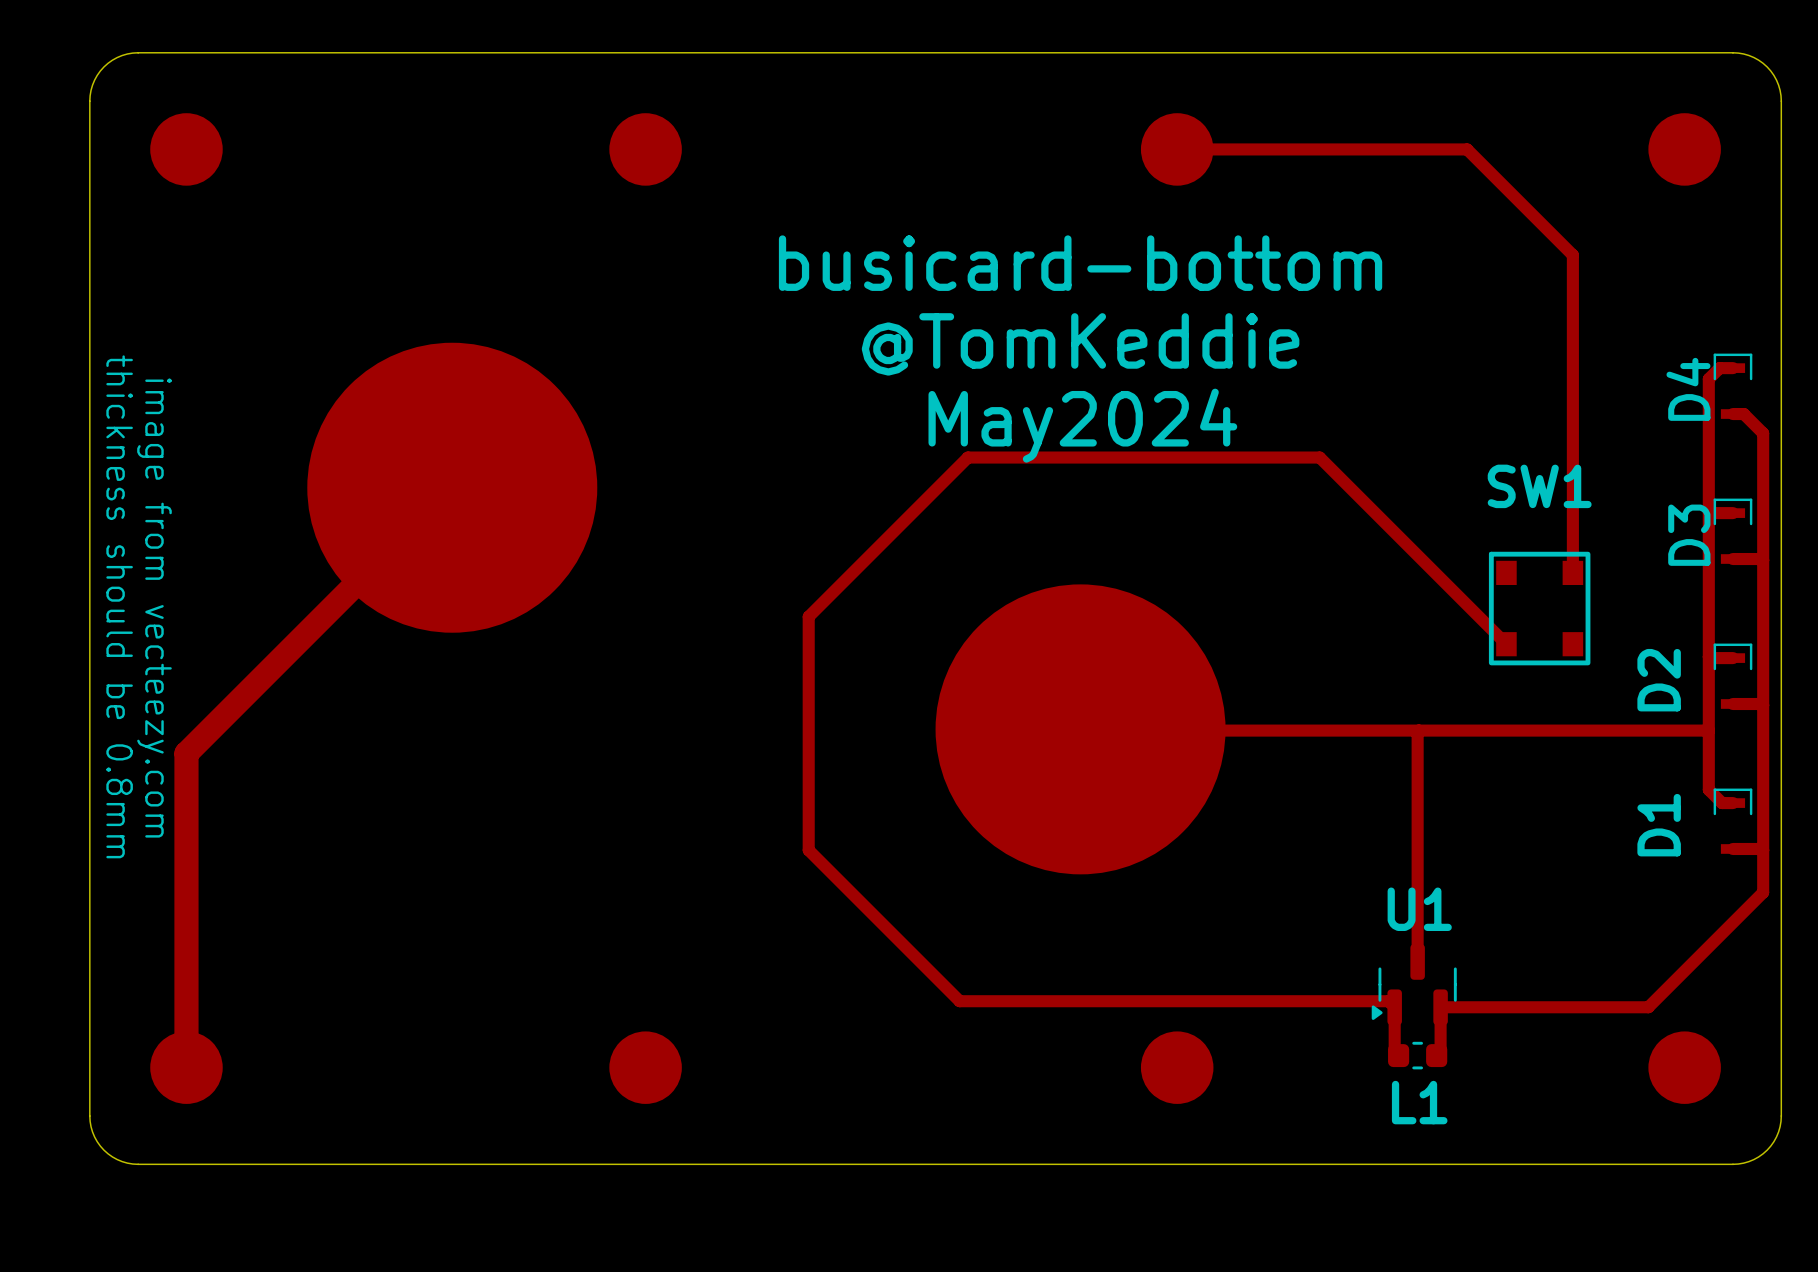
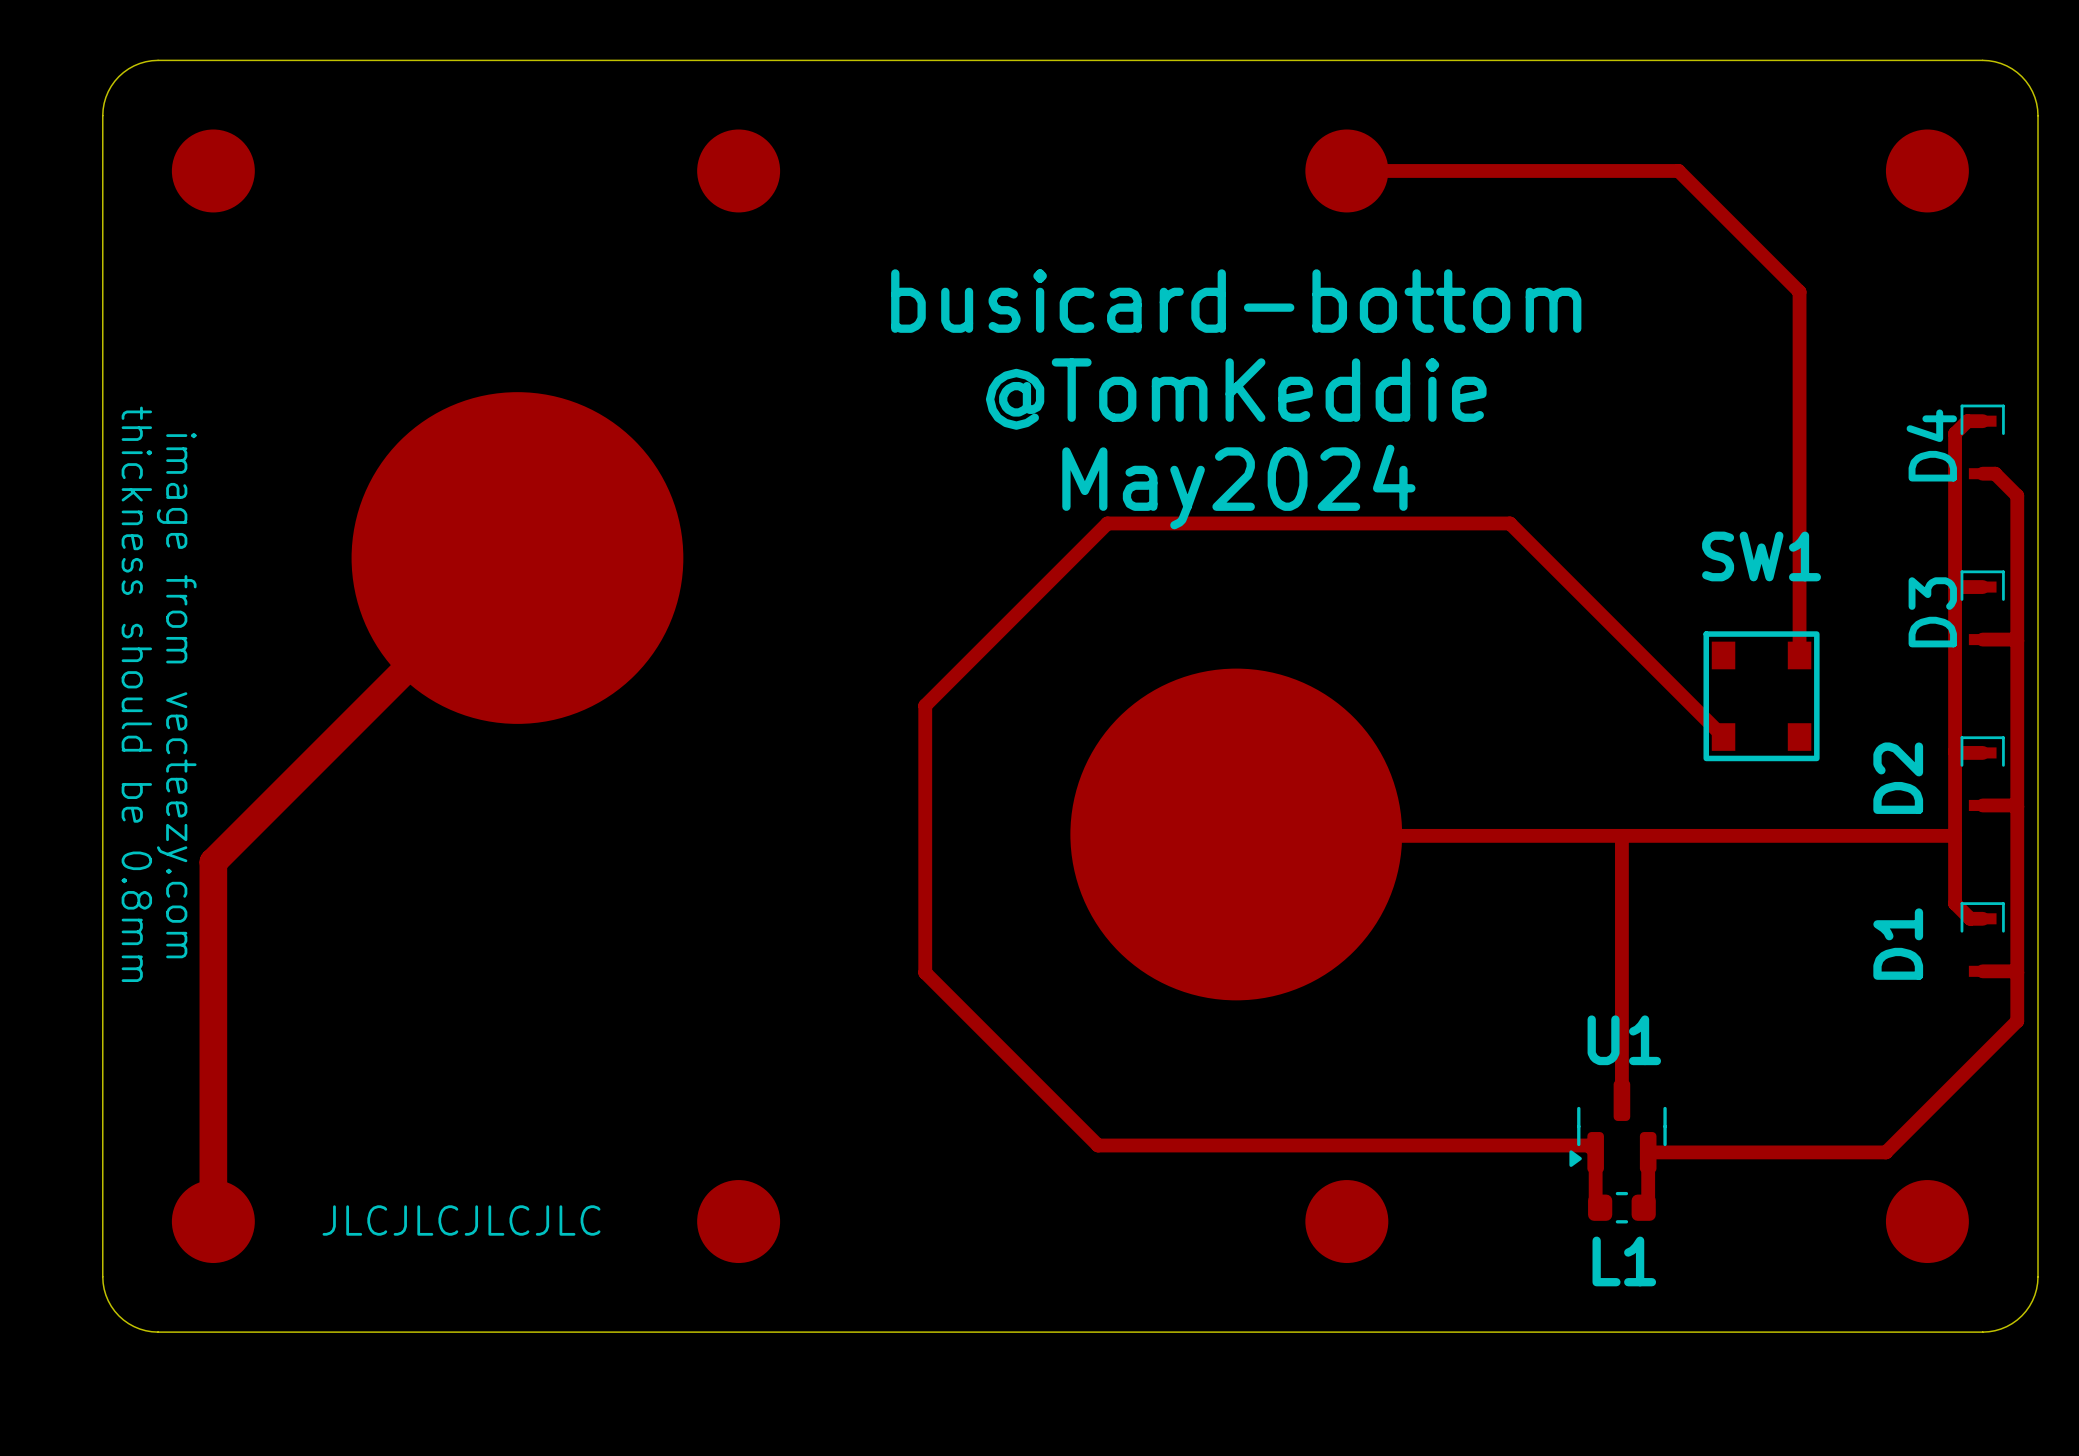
text: none -> JLCJLCJLCJLC (461, 1220)

